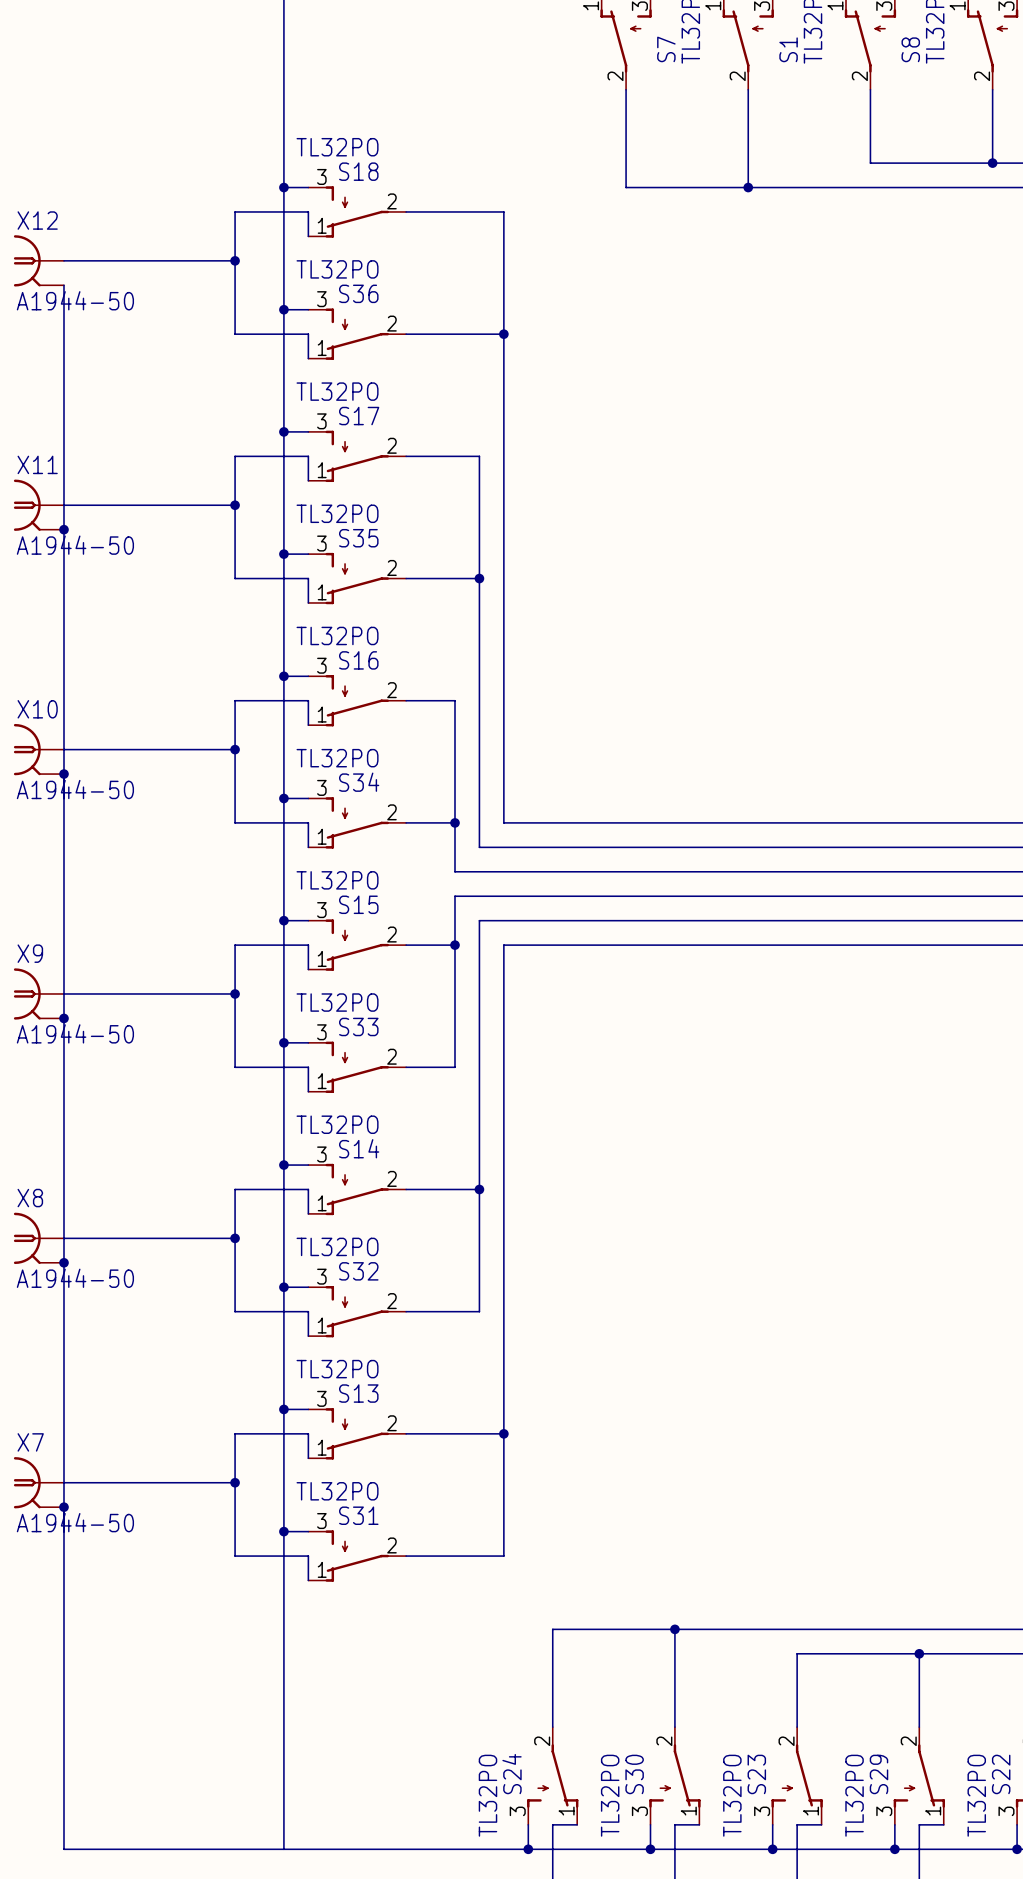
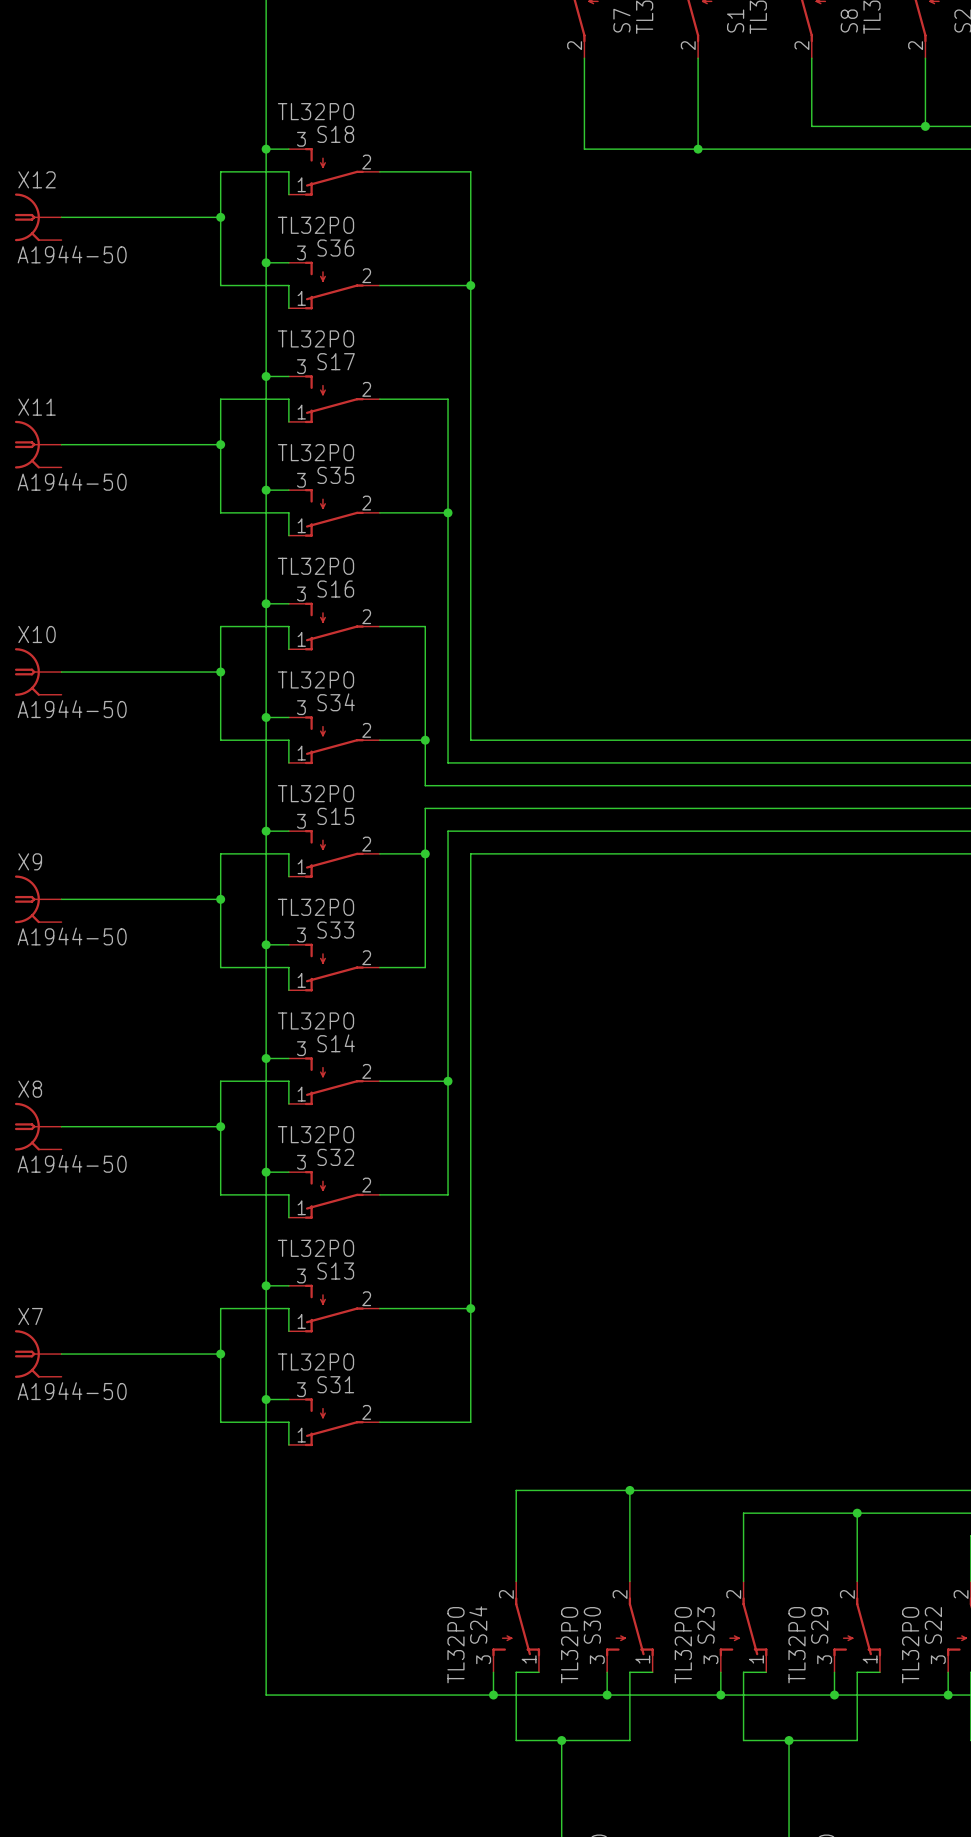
wire: (63, 285) (63, 1849) (283, 1849) -> none
junction: (63, 529) -> none
junction: (63, 774) -> none
junction: (63, 1018) -> none
junction: (63, 1262) -> none
junction: (63, 1507) -> none

